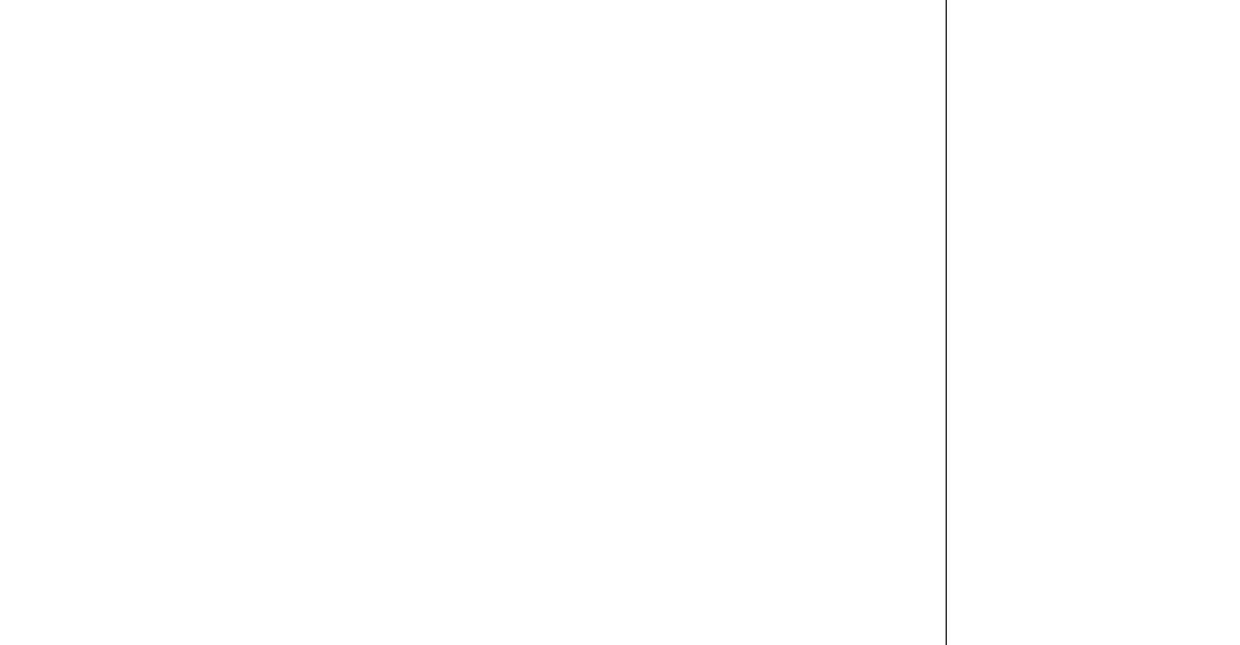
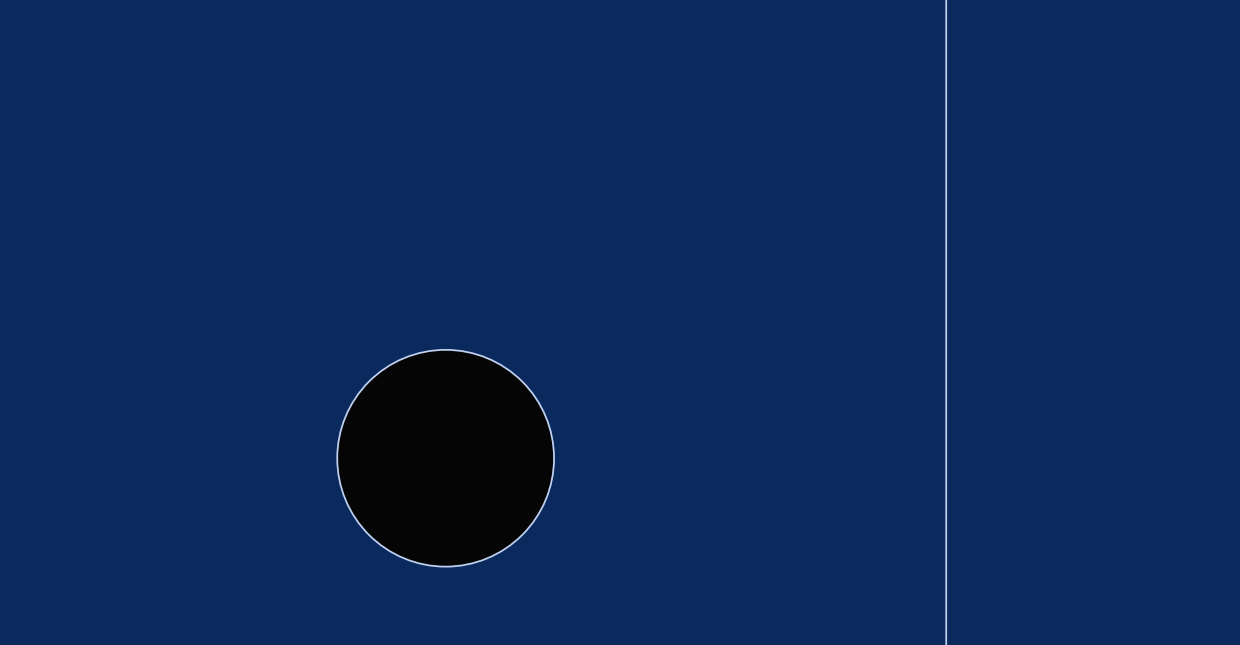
part: none -> (445, 458)

